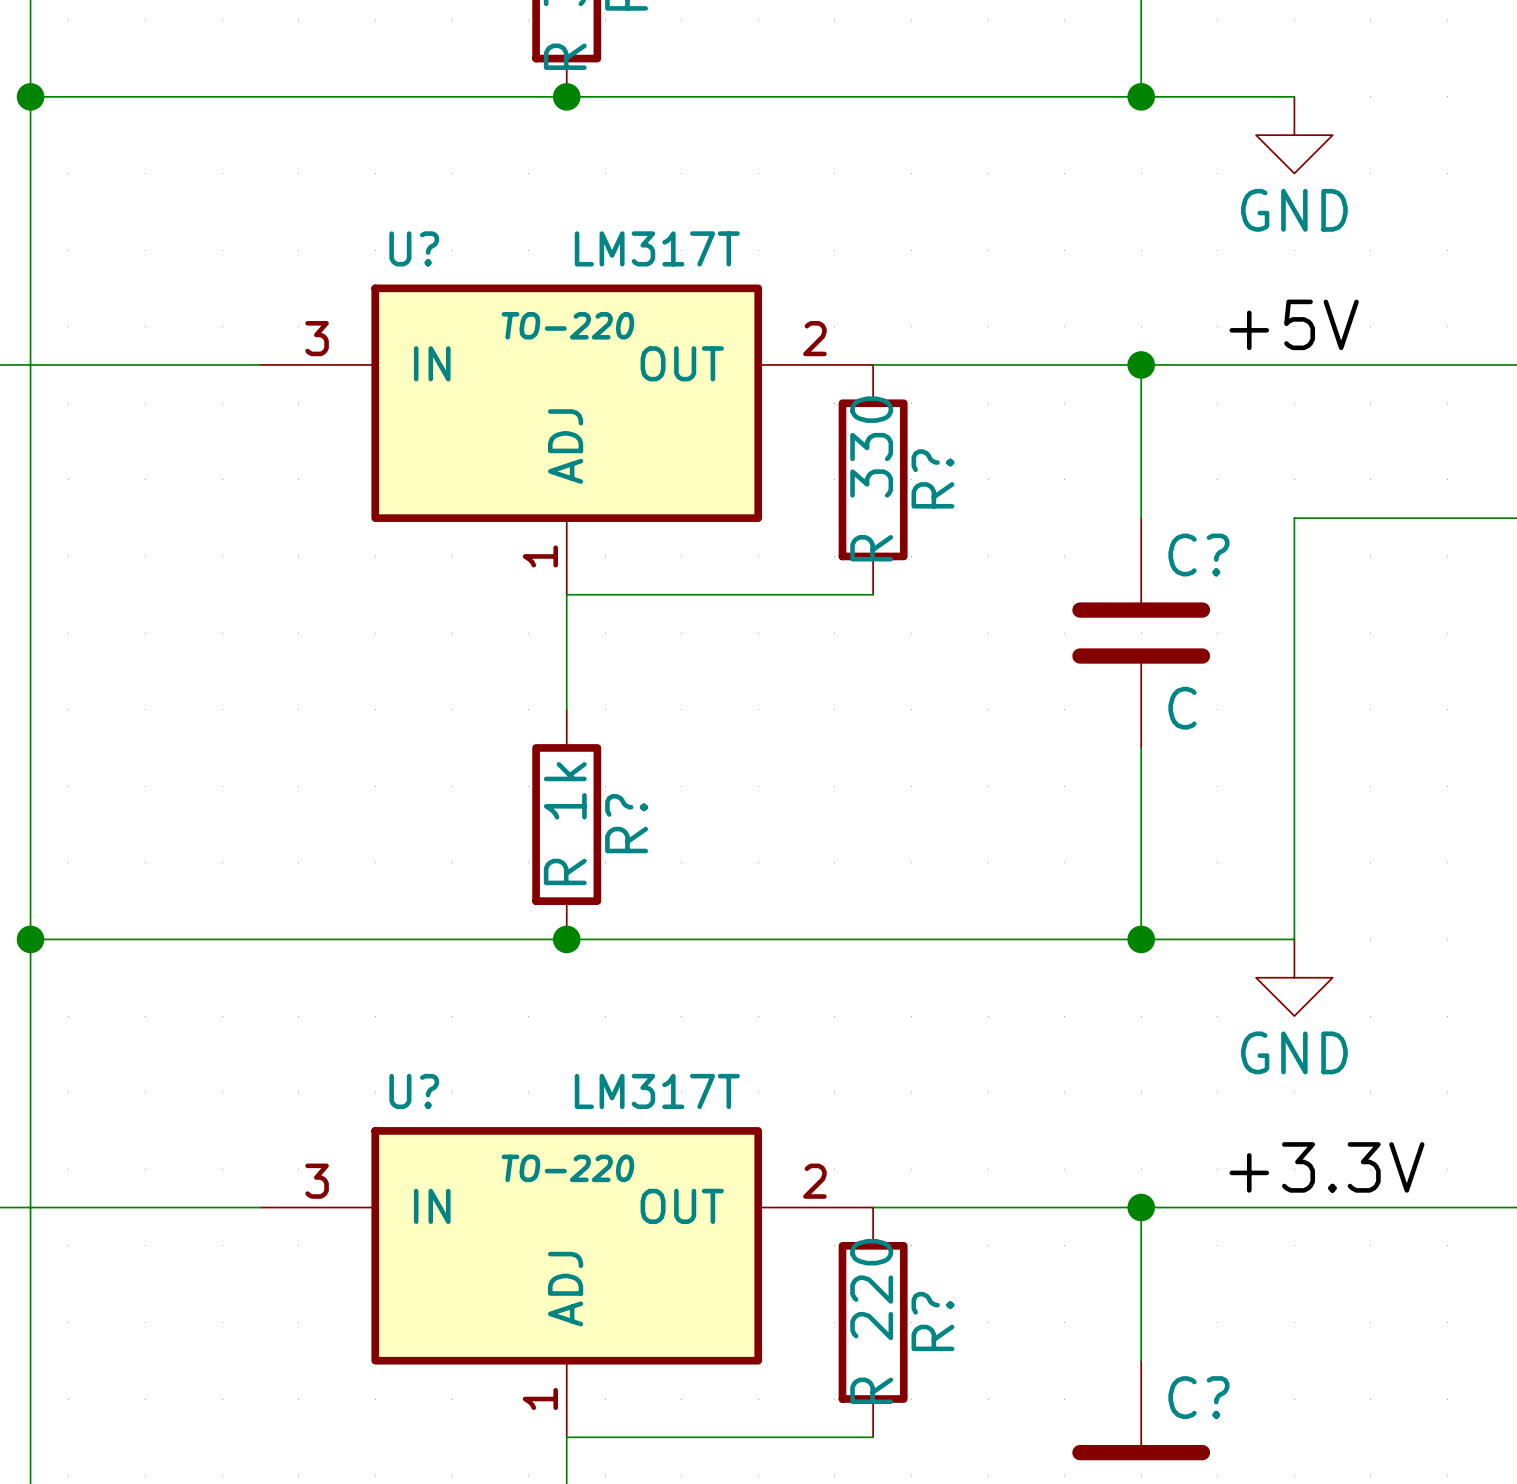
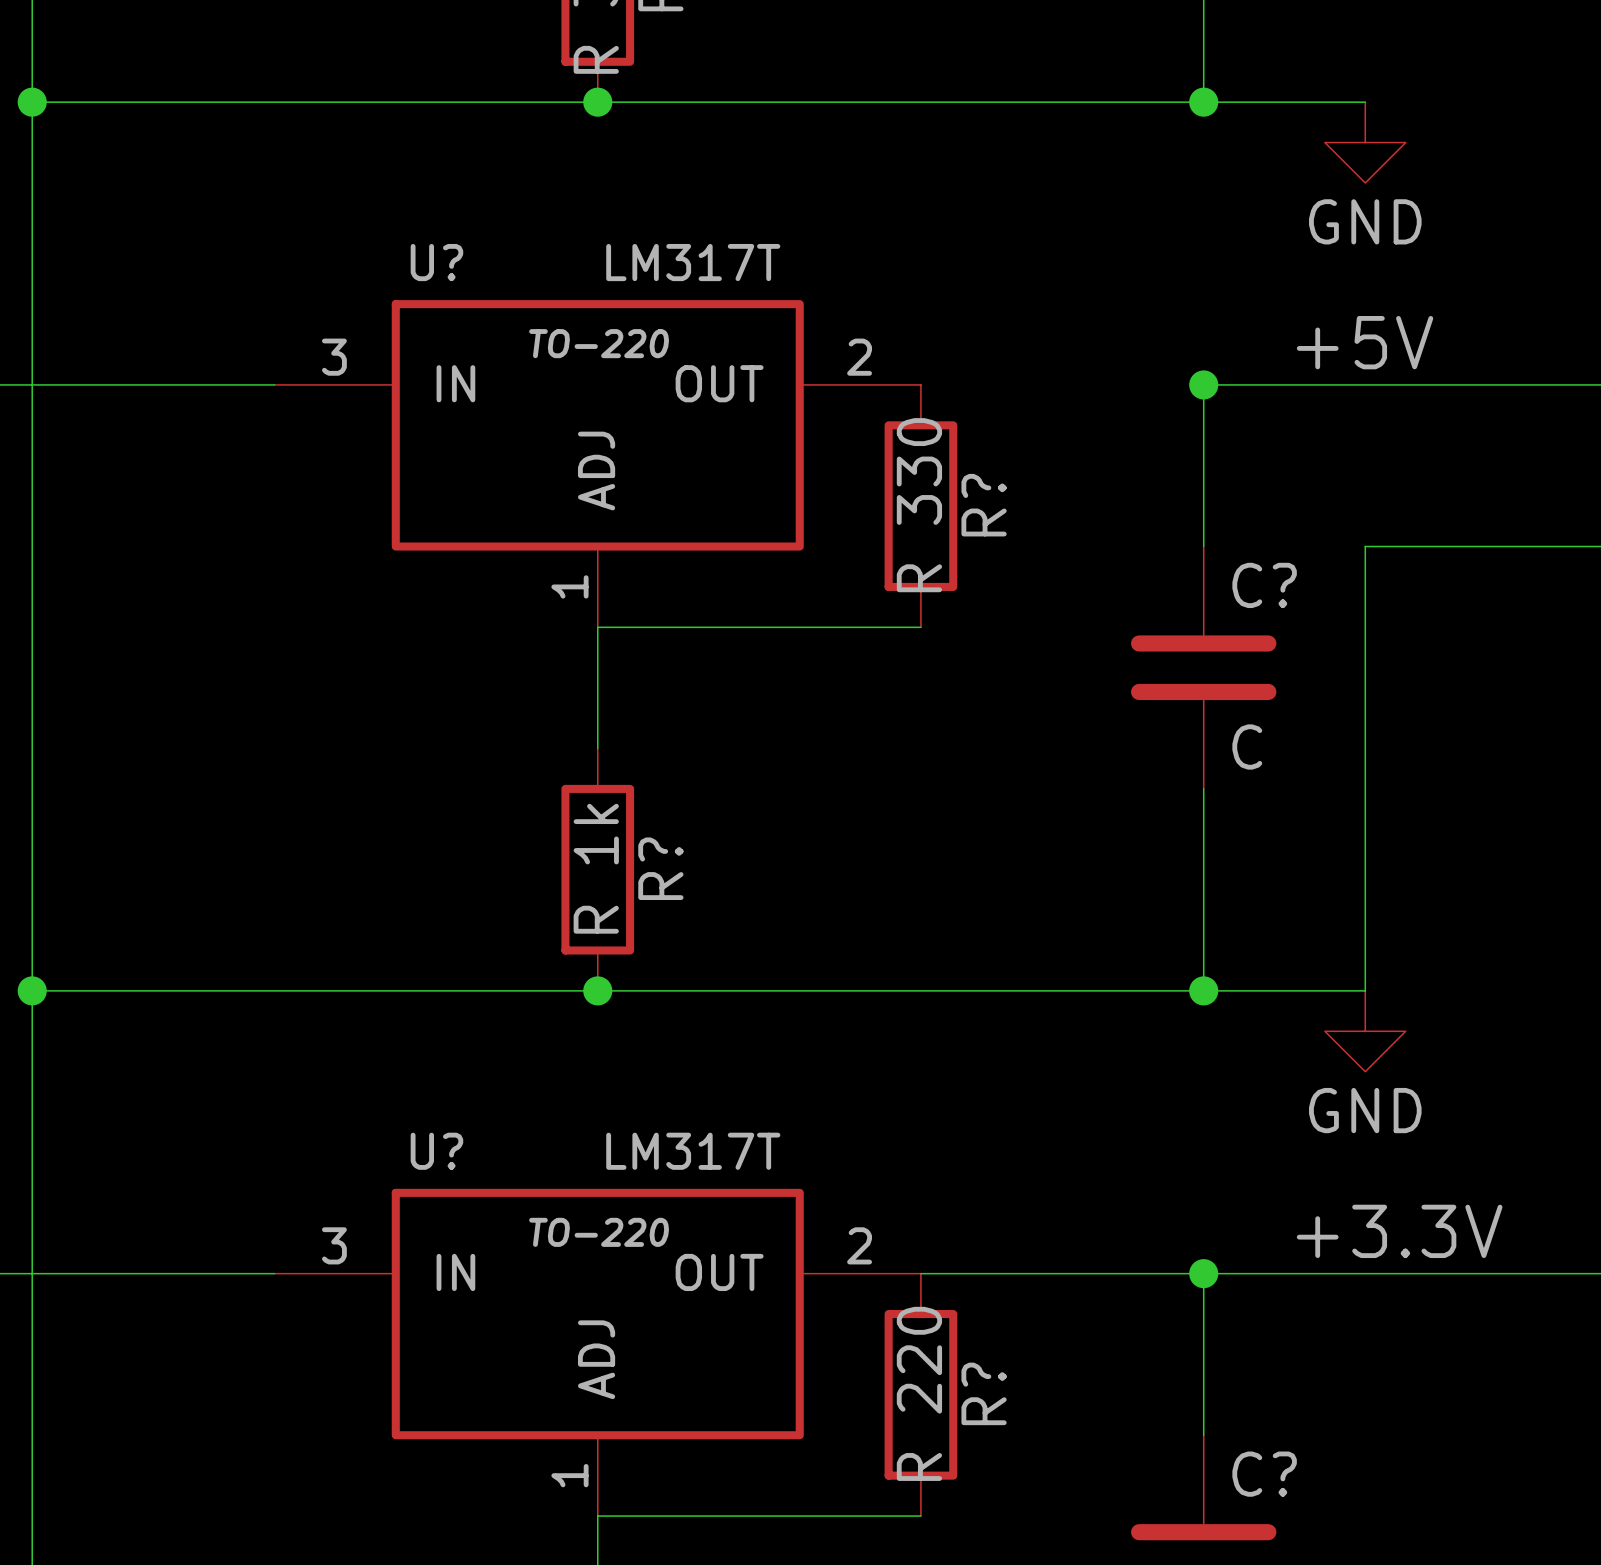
wire: (873, 364) (1141, 364) -> none

